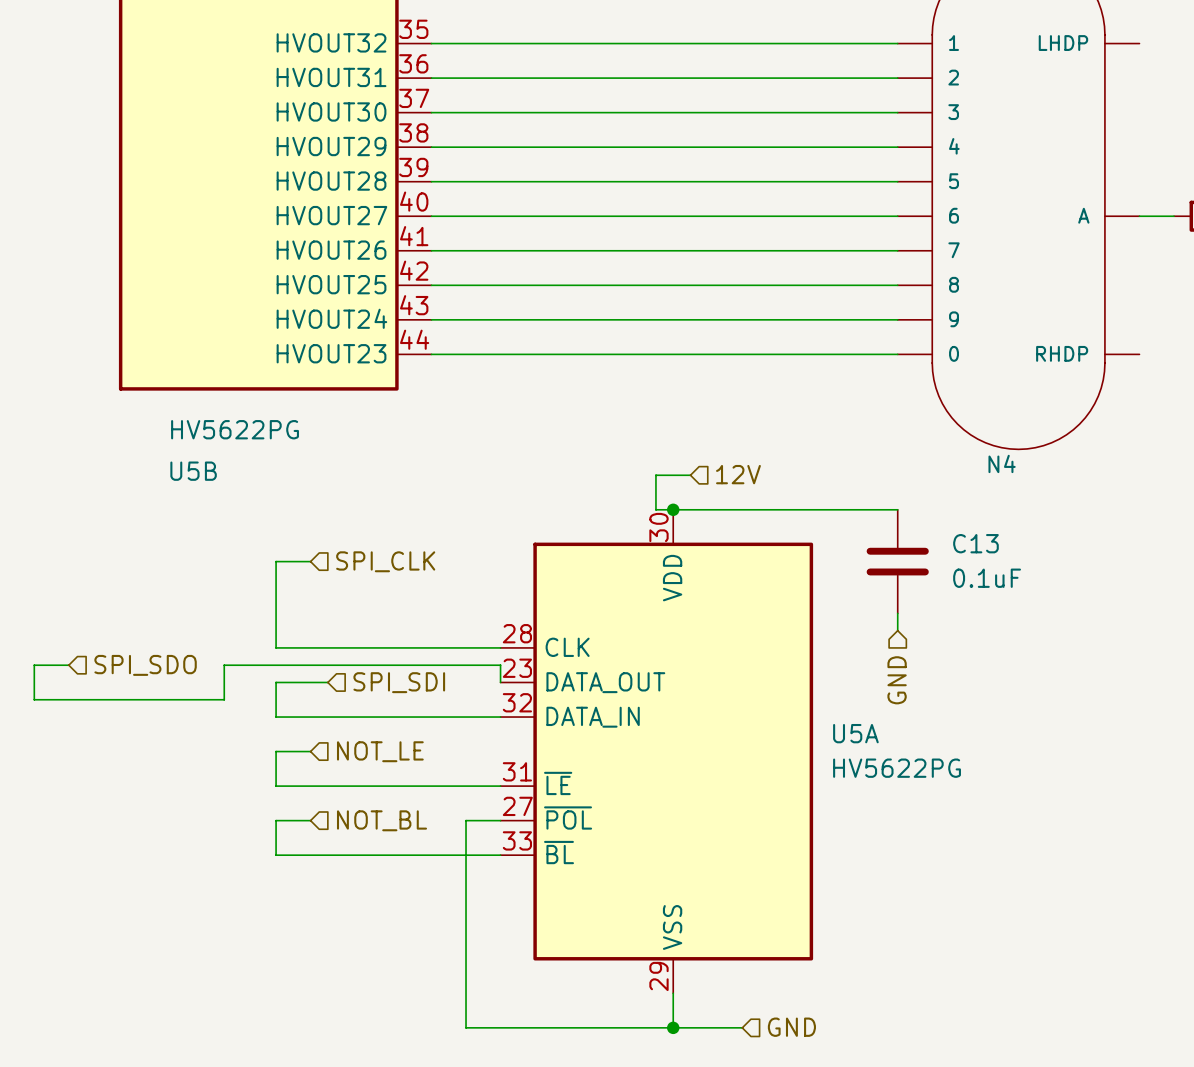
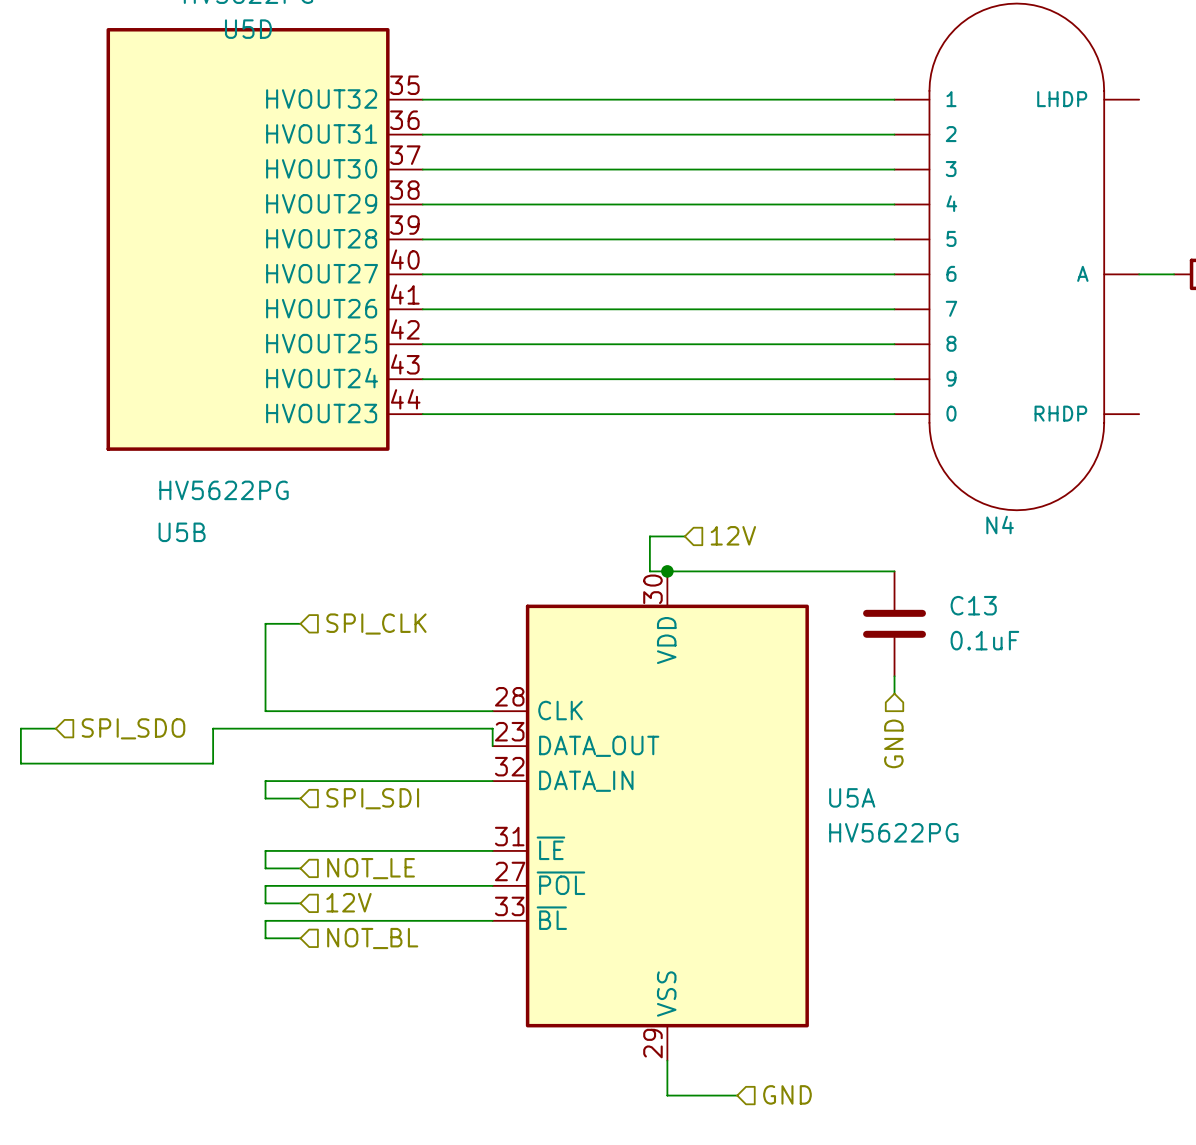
wire: (327, 682) (276, 682) (276, 717) -> (300, 798) (265, 798) (265, 781)
hierarchical label position: SPI_SDI (399, 682) -> SPI_SDI (372, 798)
wire: (310, 751) (276, 751) (276, 786) -> (300, 868) (265, 868) (265, 850)
hierarchical label position: NOT_LE (380, 751) -> NOT_LE (371, 868)
hierarchical label position: NOT_BL (381, 820) -> NOT_BL (372, 938)
wire: (466, 820) (466, 1027) (673, 1027) -> (457, 885) (300, 885)
wire: (276, 837) (276, 855) -> (265, 903) (300, 903)
hierarchical label: none -> 12V (348, 902)
wire: none -> (265, 920) (265, 938) (300, 938)
junction: (673, 1027) -> none

